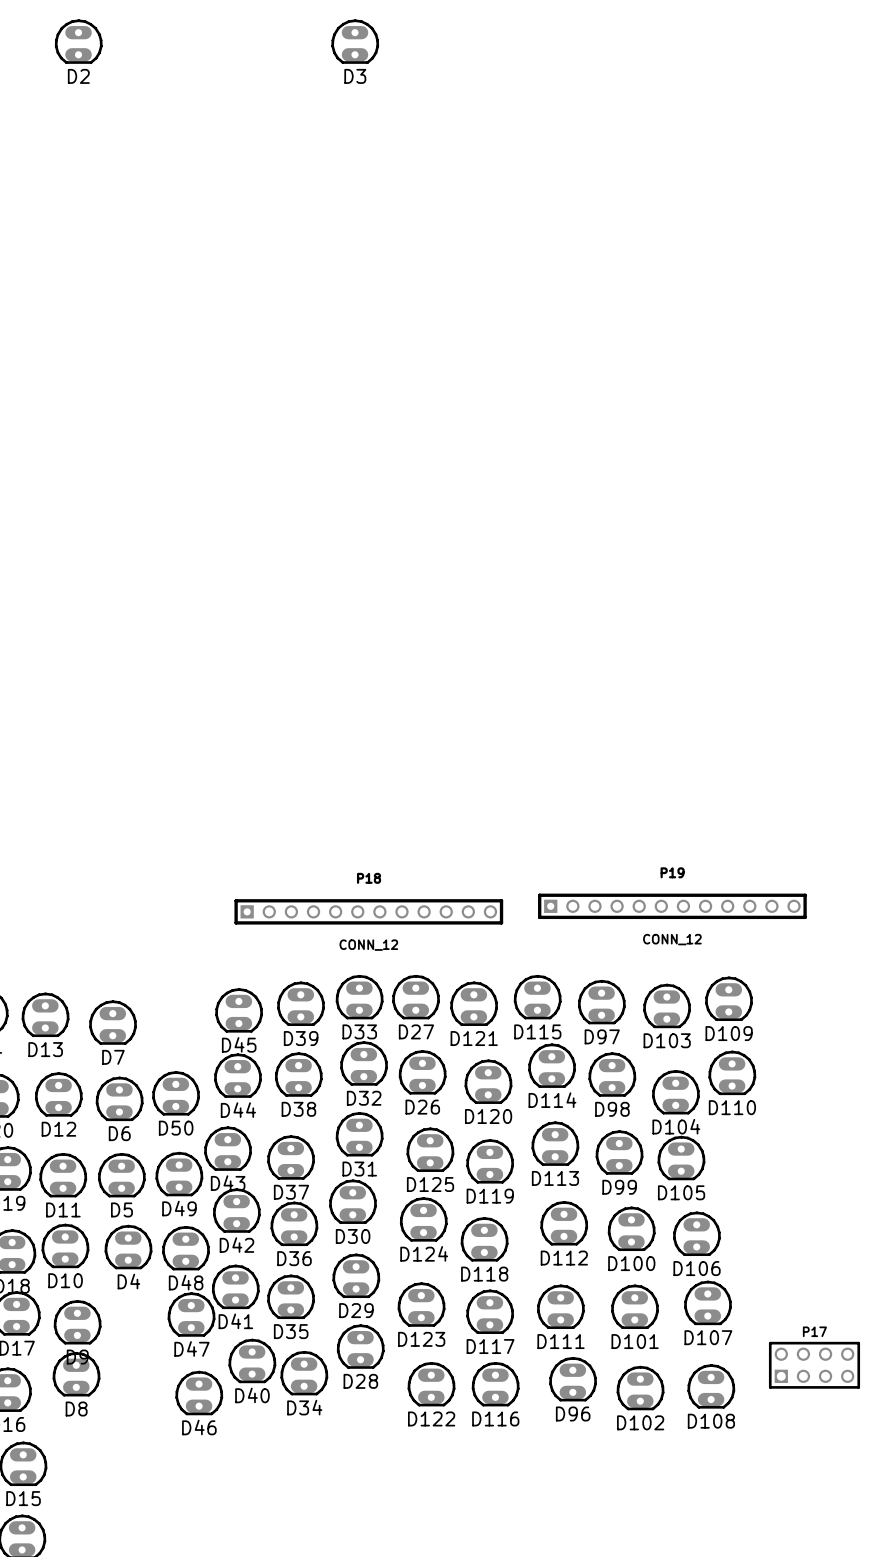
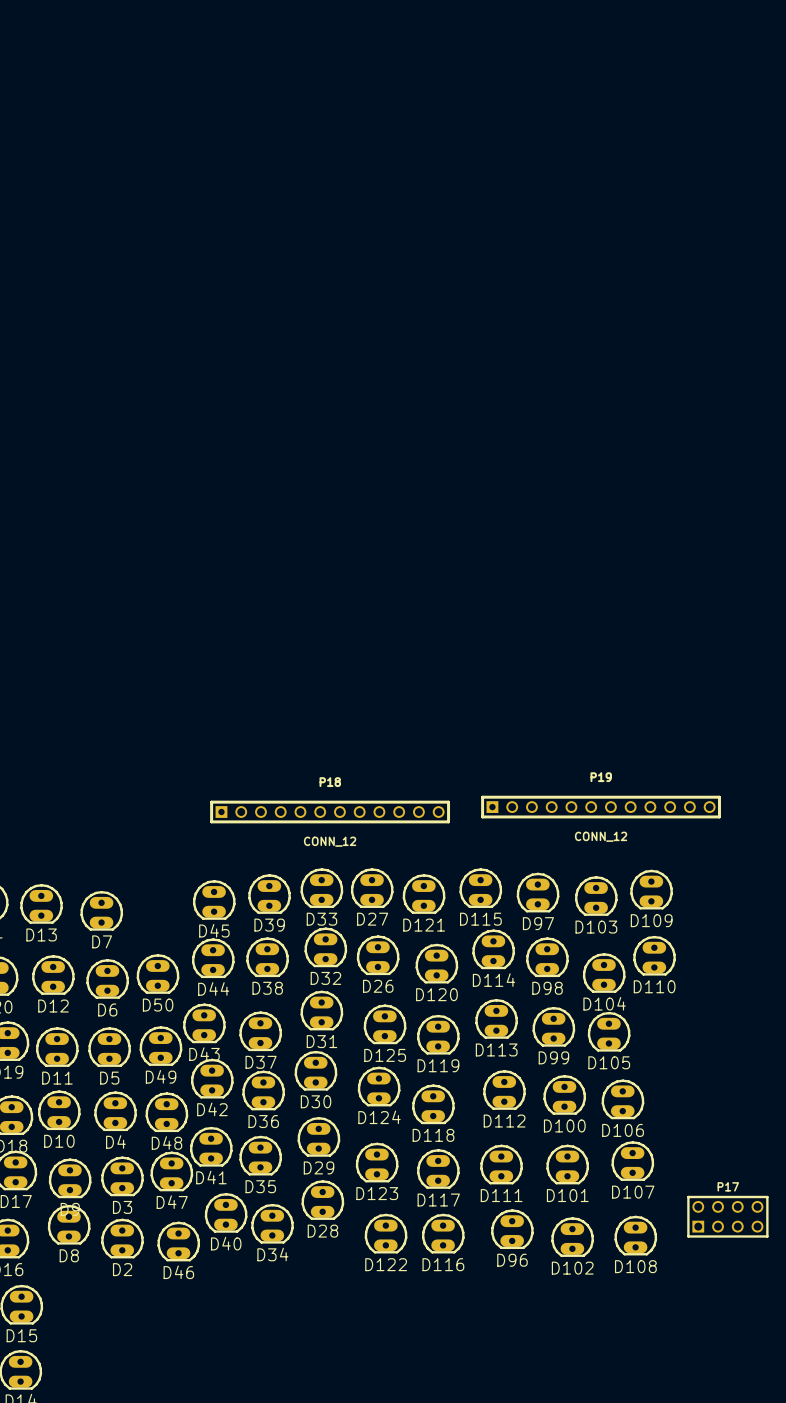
D2 position: (78, 41) -> (122, 1238)
D3 position: (355, 41) -> (122, 1176)

